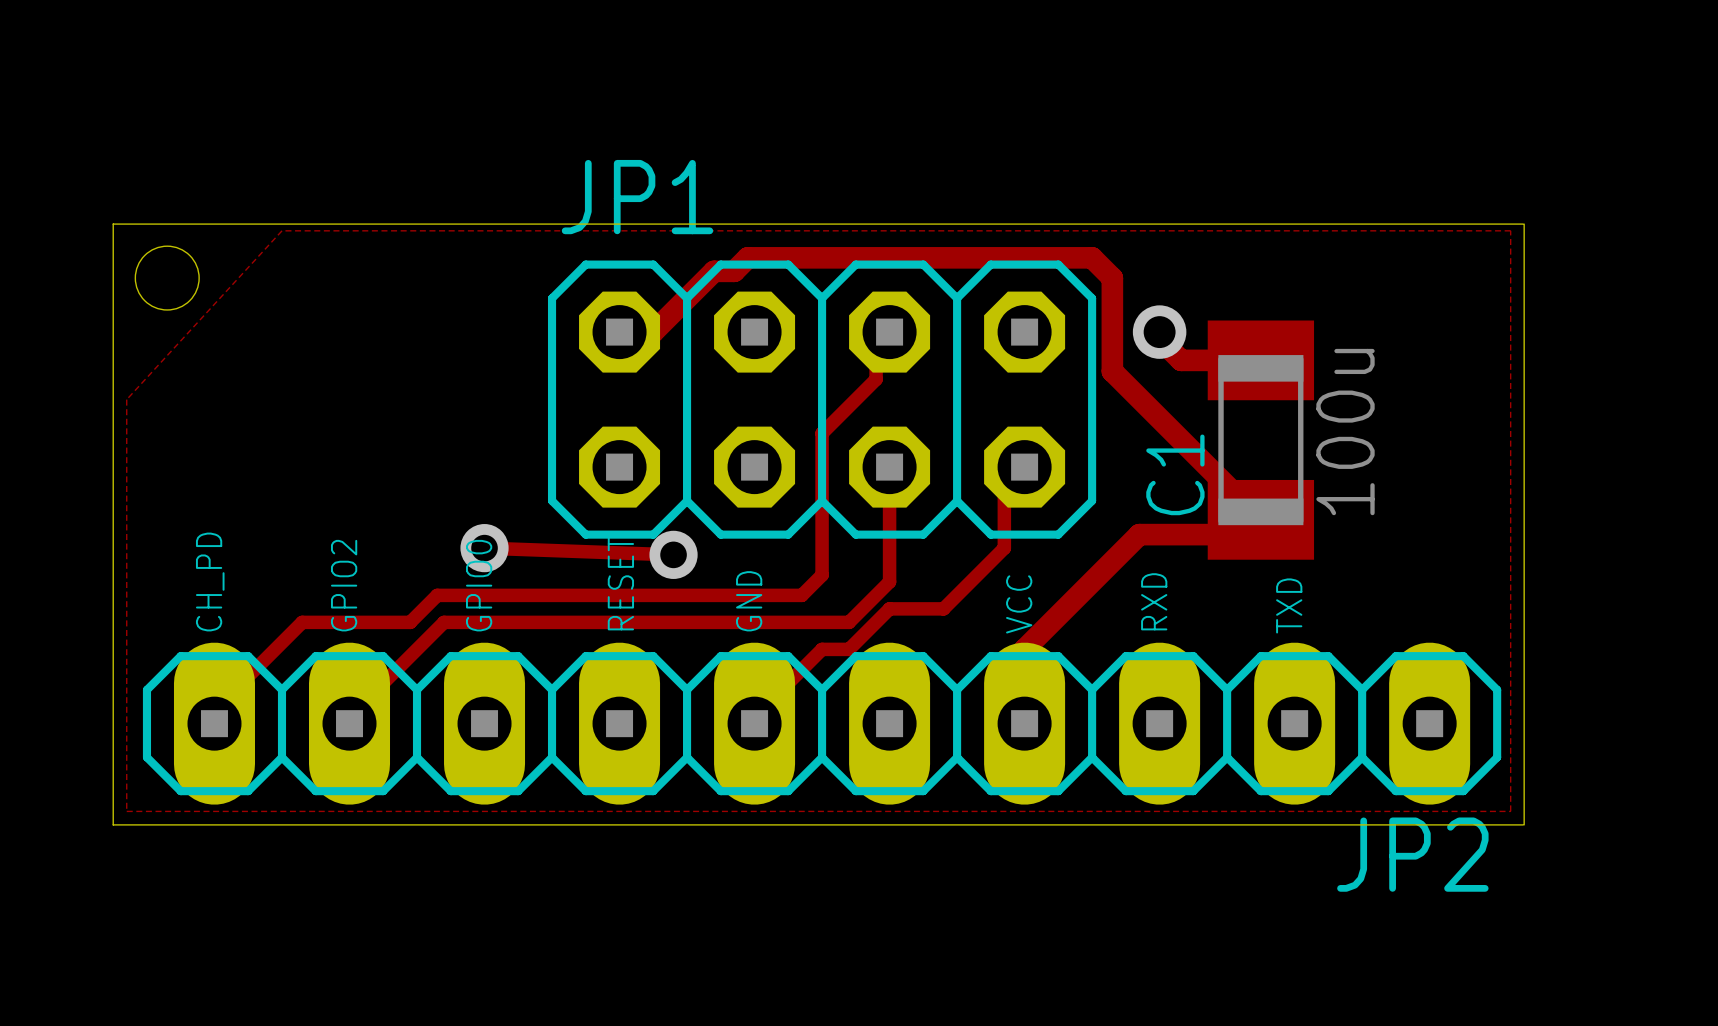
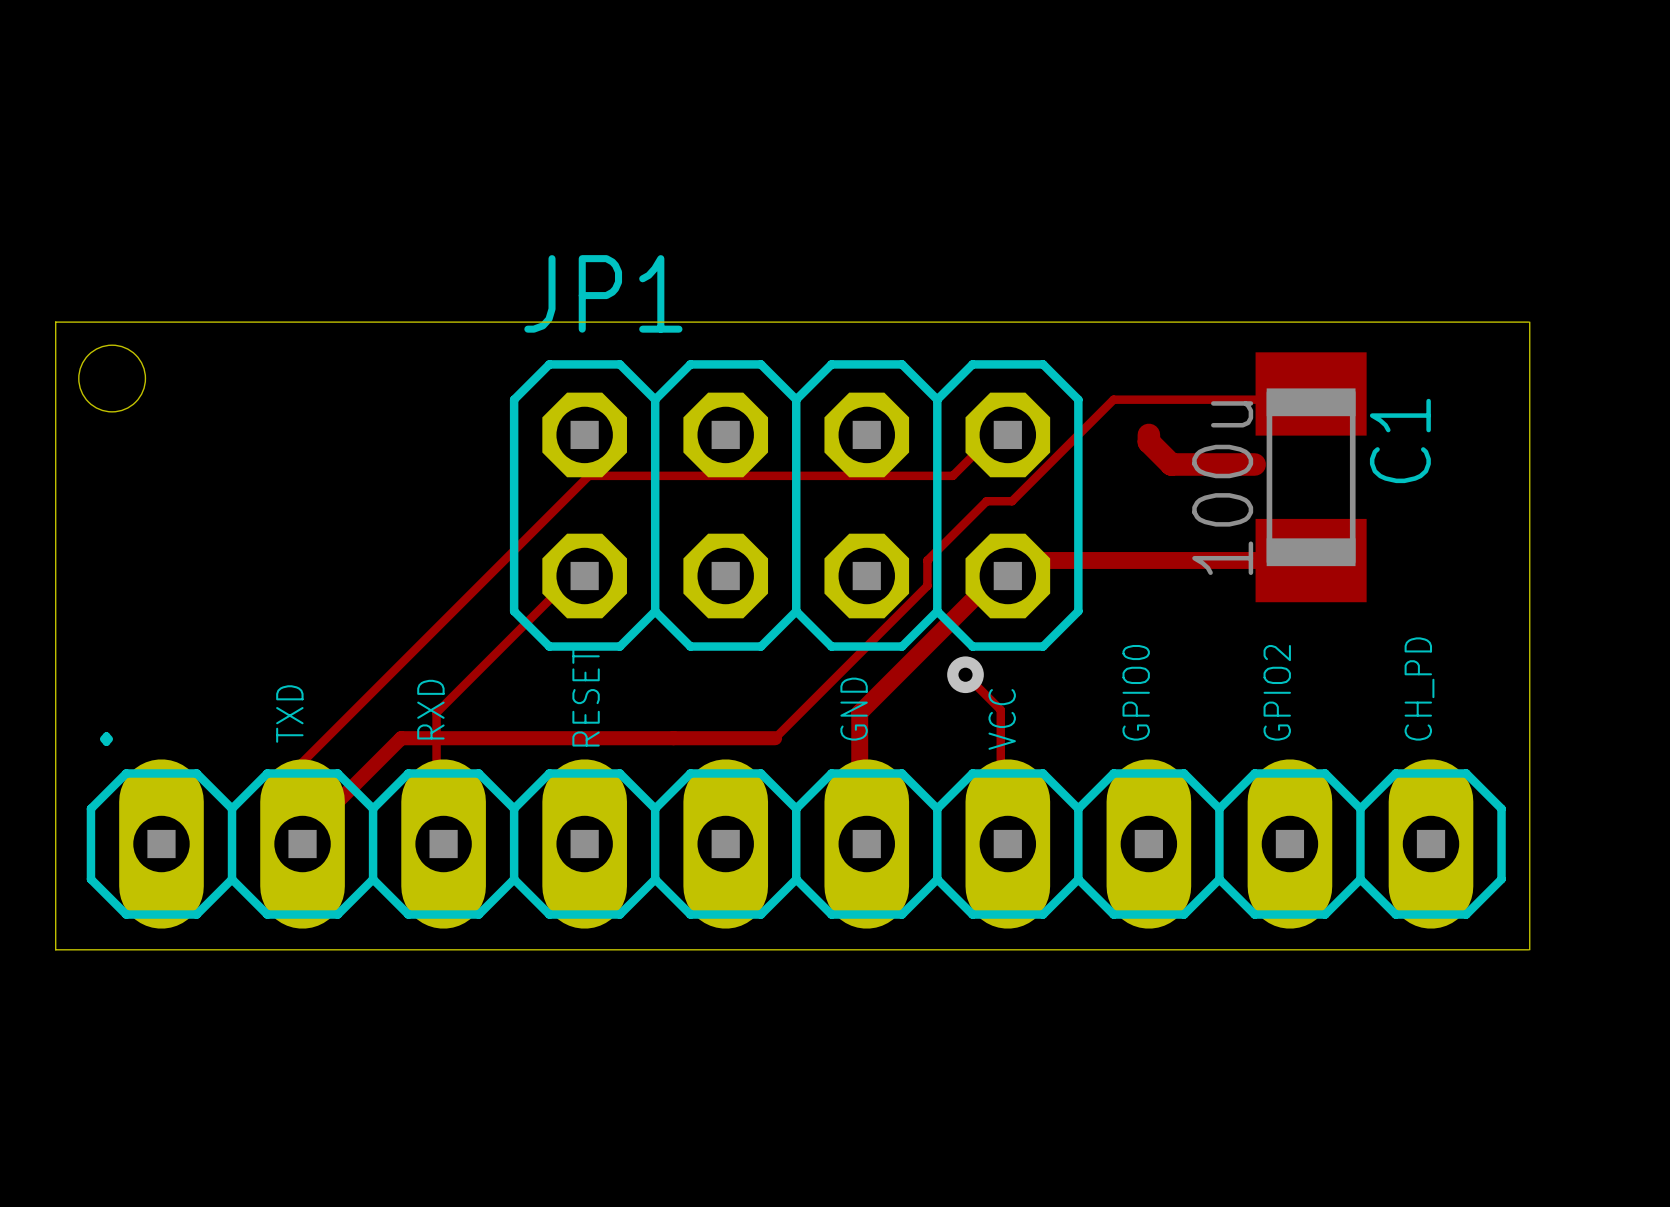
zone outline: (282, 230) (1510, 230) (1510, 811) (126, 811) (126, 399) (282, 230) -> none
track: none -> (1007, 420) (952, 475) (588, 475) (301, 763) (301, 831) (295, 836)
track: (619, 332) (653, 332) (714, 271) (734, 271) (747, 257) (1092, 257) (1112, 278) (1112, 371) (1260, 519) (1246, 534) (1139, 534) (1024, 649) (1024, 723) -> none
track: (889, 332) (876, 345) (876, 379) (822, 433) (822, 575) (801, 595) (437, 595) (410, 622) (302, 622) (214, 710) (214, 723) -> none
via: (1159, 332) -> none
C1 value position: 100u (1345, 432) -> 100u (1222, 488)
C1 position: (1260, 440) -> (1311, 477)
track: none -> (1311, 560) (1007, 561) (1003, 568) (859, 712) (859, 836)
track: none -> (584, 561) (580, 568) (436, 712) (436, 836)
track: (889, 467) (889, 581) (849, 622) (801, 622) -> (1311, 393) (1308, 399) (1113, 399) (1012, 501) (986, 501) (927, 560) (927, 585) (775, 738)
track: (1024, 467) (1004, 487) (1004, 548) (943, 608) (889, 608) (849, 649) (822, 649) (754, 716) (754, 723) -> none
C1 name position: C1 (1175, 474) -> C1 (1400, 440)
track: (484, 548) (673, 554) -> none
via: (484, 548) -> none
via: (673, 554) -> none
track: none -> (965, 674) (1000, 710) (1000, 836)
via: none -> (965, 674)
text position: CH_PD (210, 582) -> CH_PD (1419, 688)
text position: GPIO2 (344, 585) -> GPIO2 (1277, 692)
text position: GPIO0 (479, 585) -> GPIO0 (1136, 692)
text position: GND (749, 601) -> GND (854, 709)
text position: RXD (1154, 601) -> RXD (430, 709)
text position: TXD (1289, 605) -> TXD (289, 714)
JP2 name: JP2 (1412, 854) -> . (106, 739)

